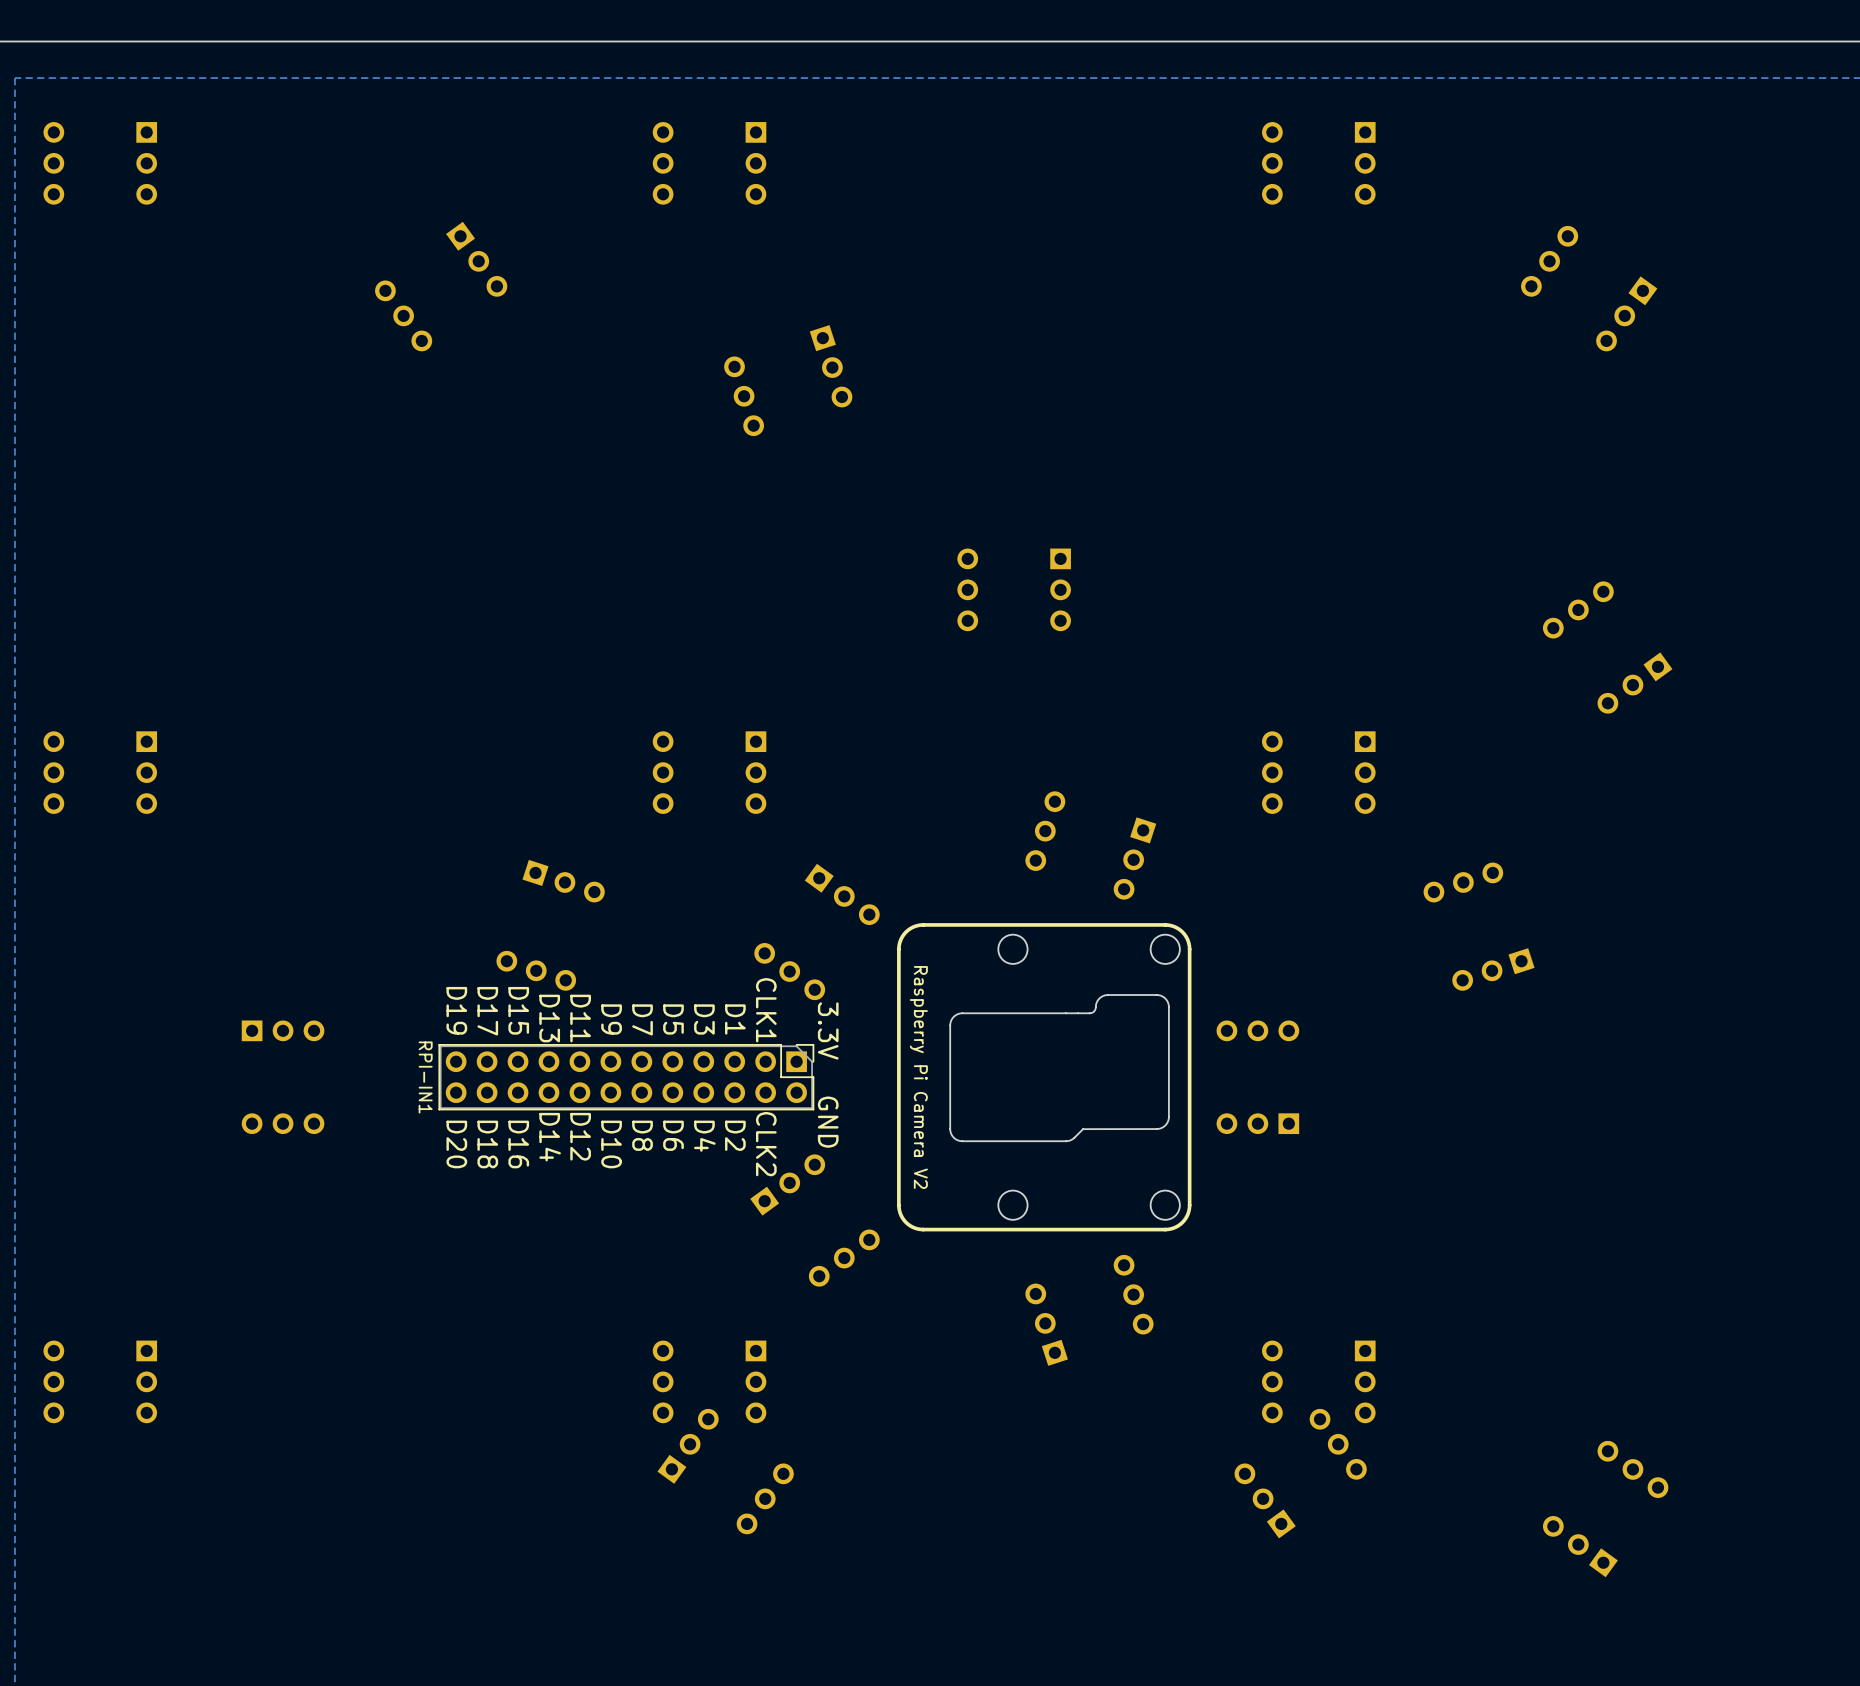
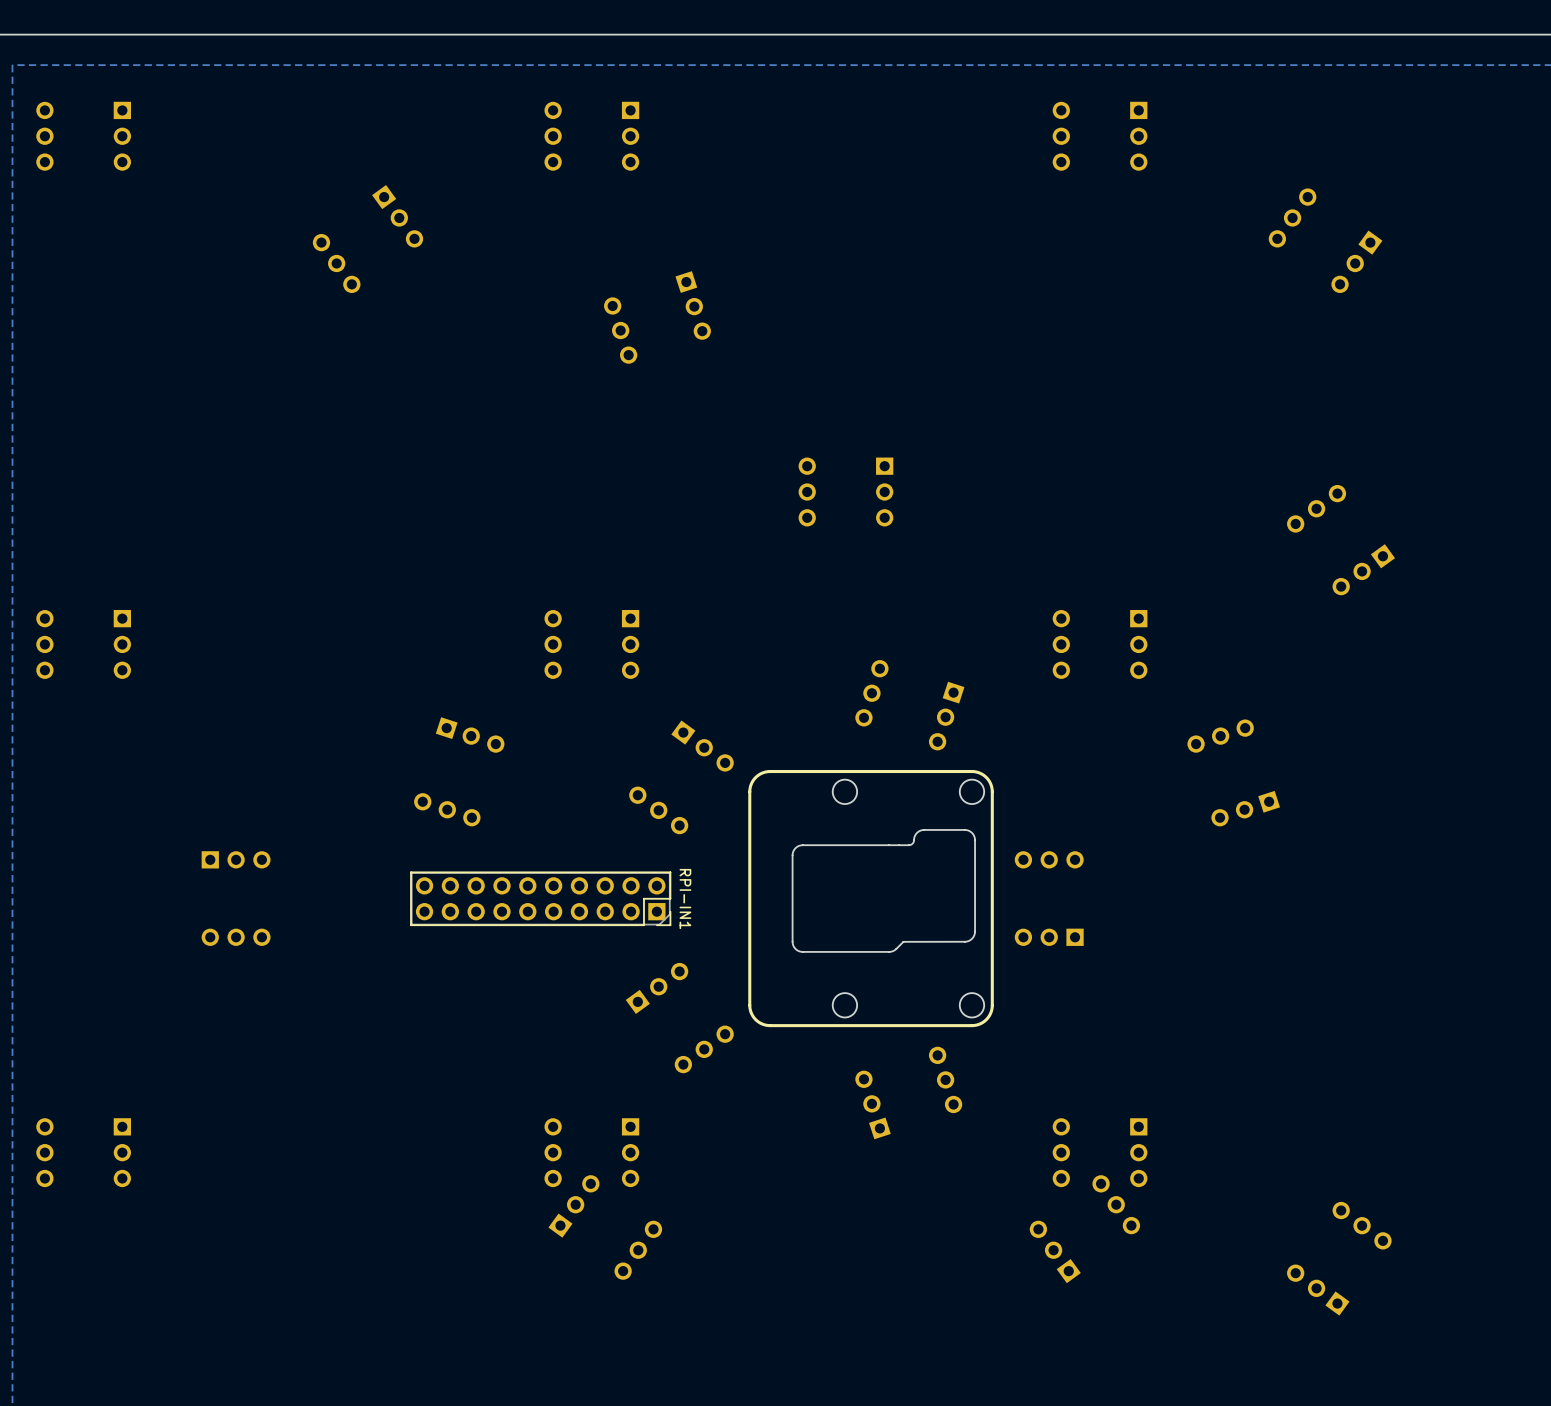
RPI-IN1 footprint: [438, 1044, 815, 1111] -> [410, 871, 672, 926]
RPI-IN1 name position: RPI-IN1 (425, 1077) -> RPI-IN1 (685, 899)
part value: Raspberry Pi Camera V2 (918, 1077) -> none

